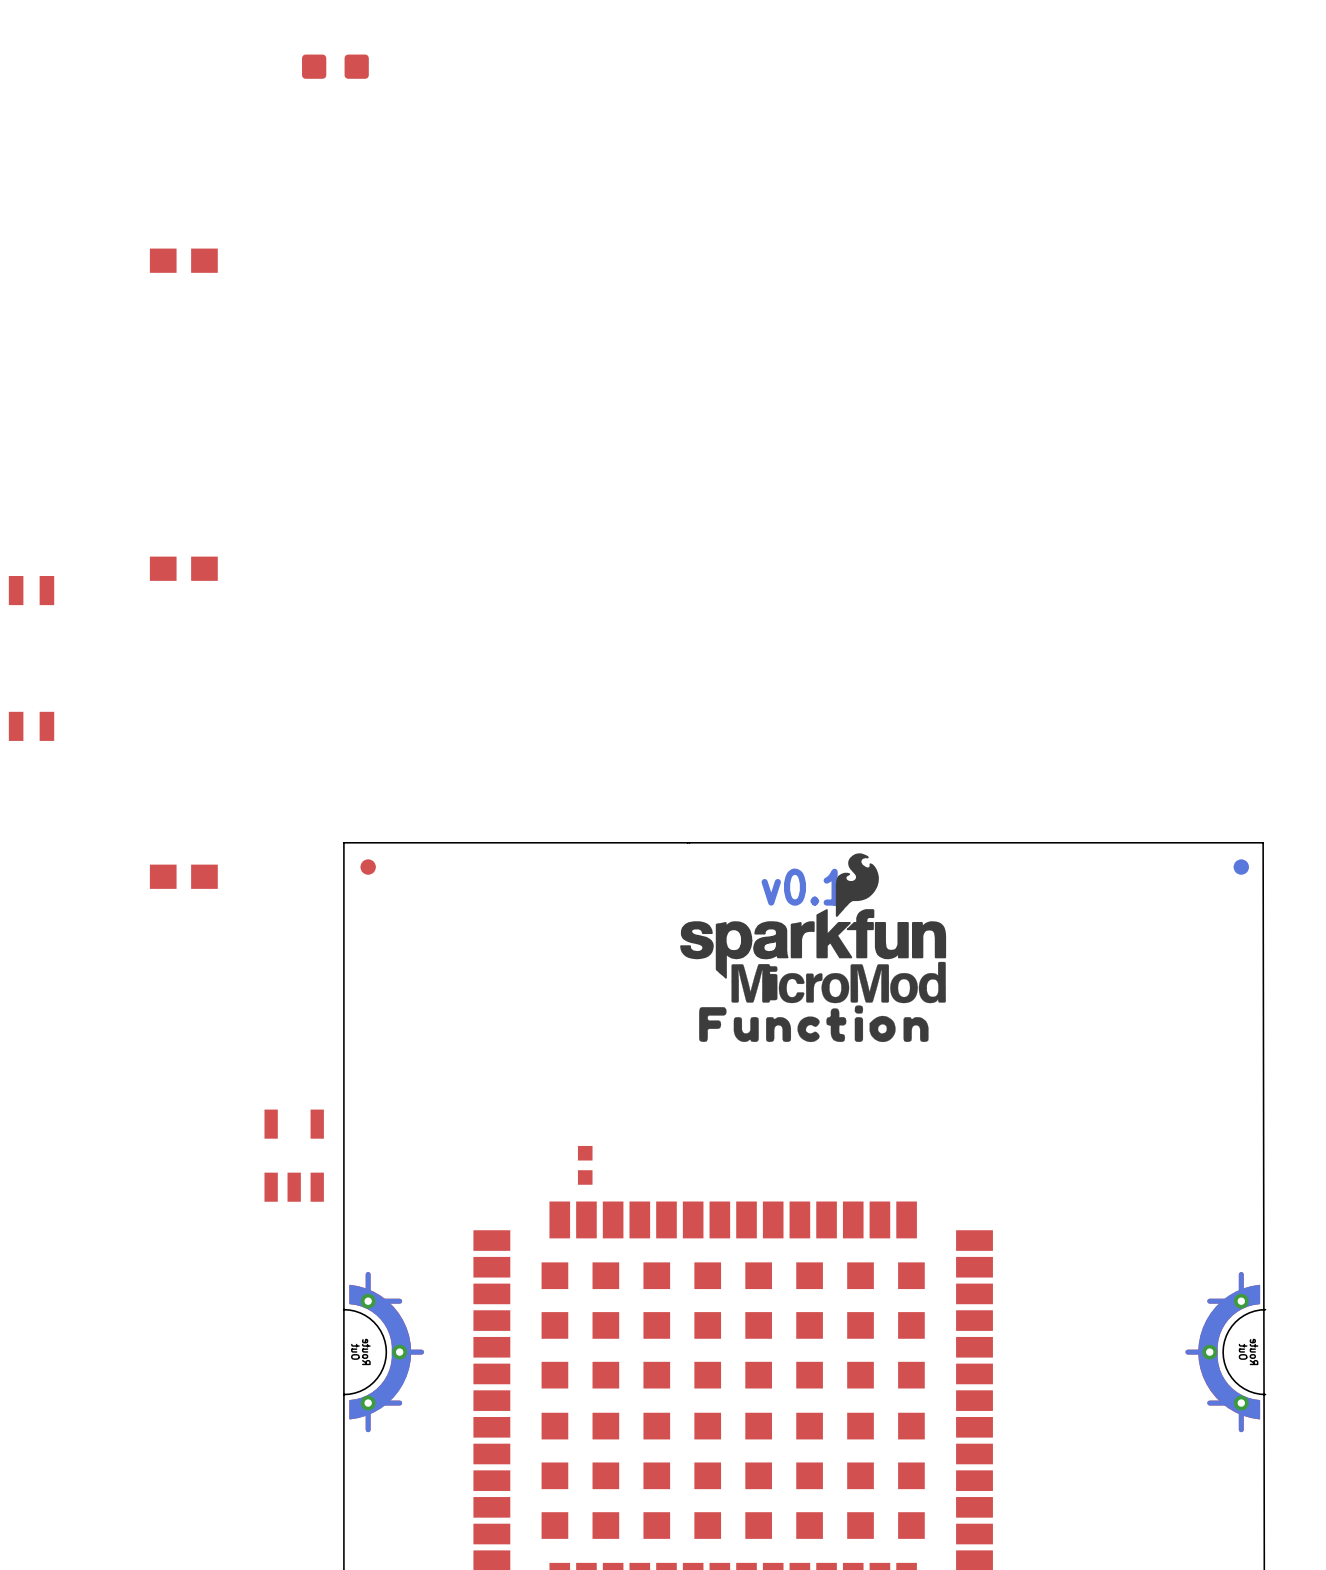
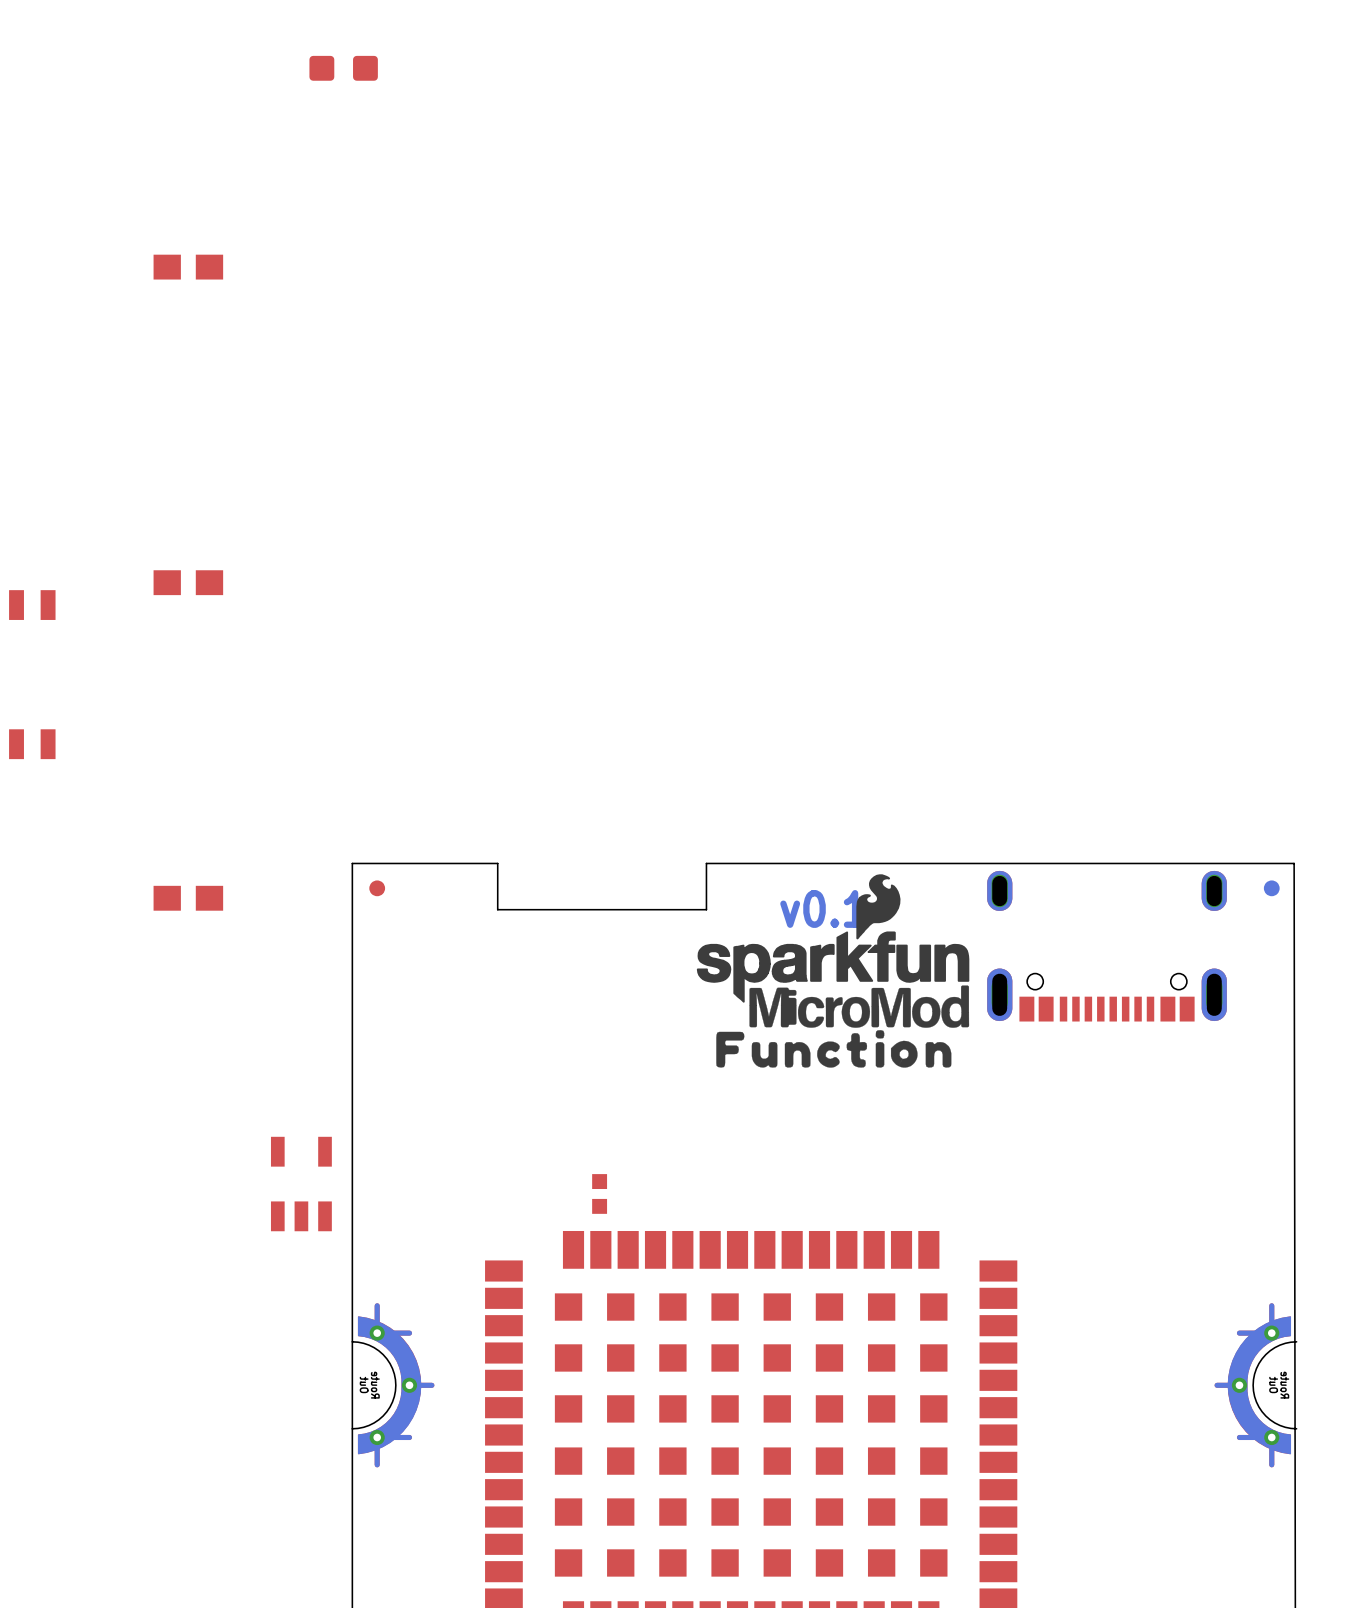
board edge: (689, 842) (485, 842) -> (706, 863) (706, 909) (497, 909) (497, 863)
part: none -> (1107, 946)

